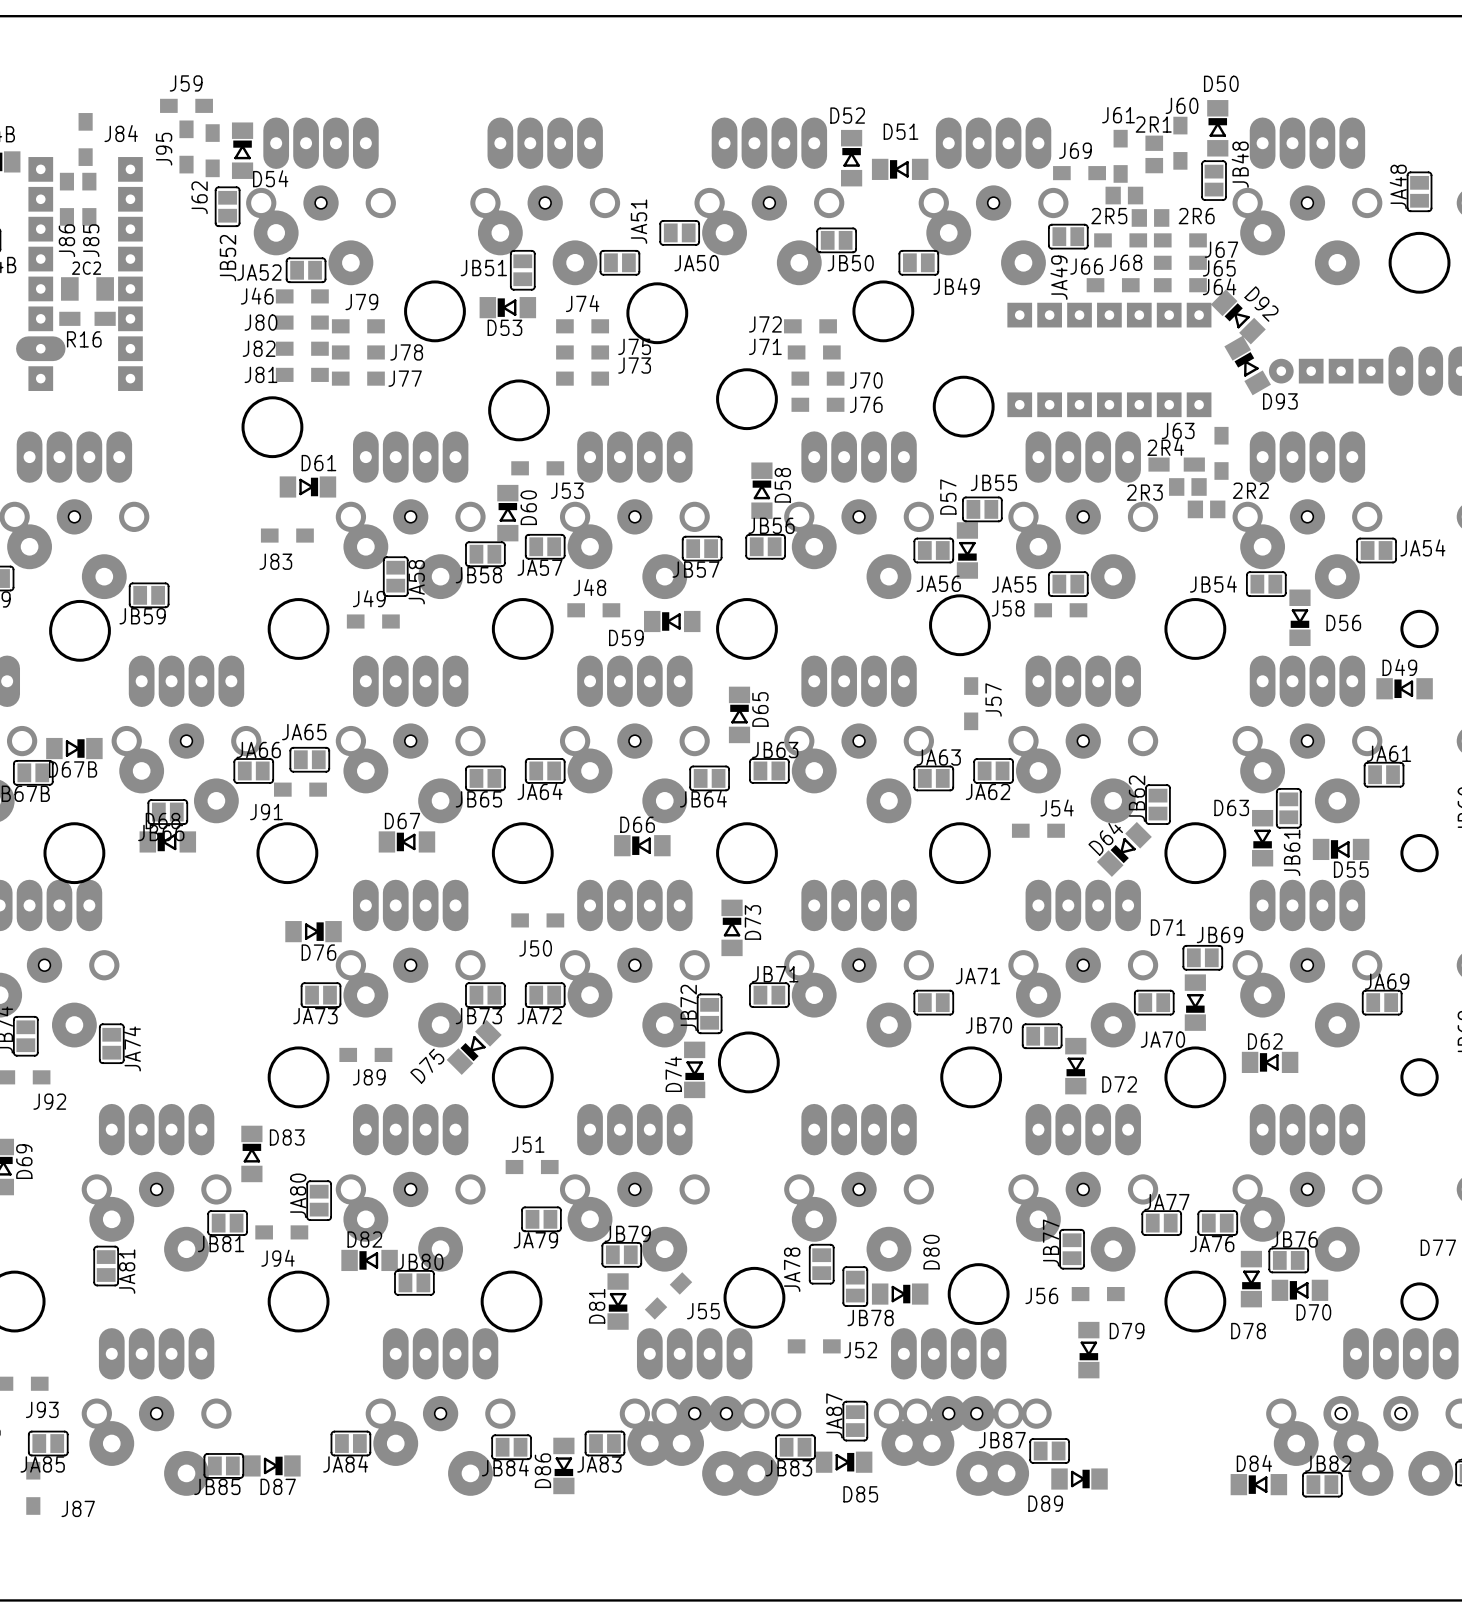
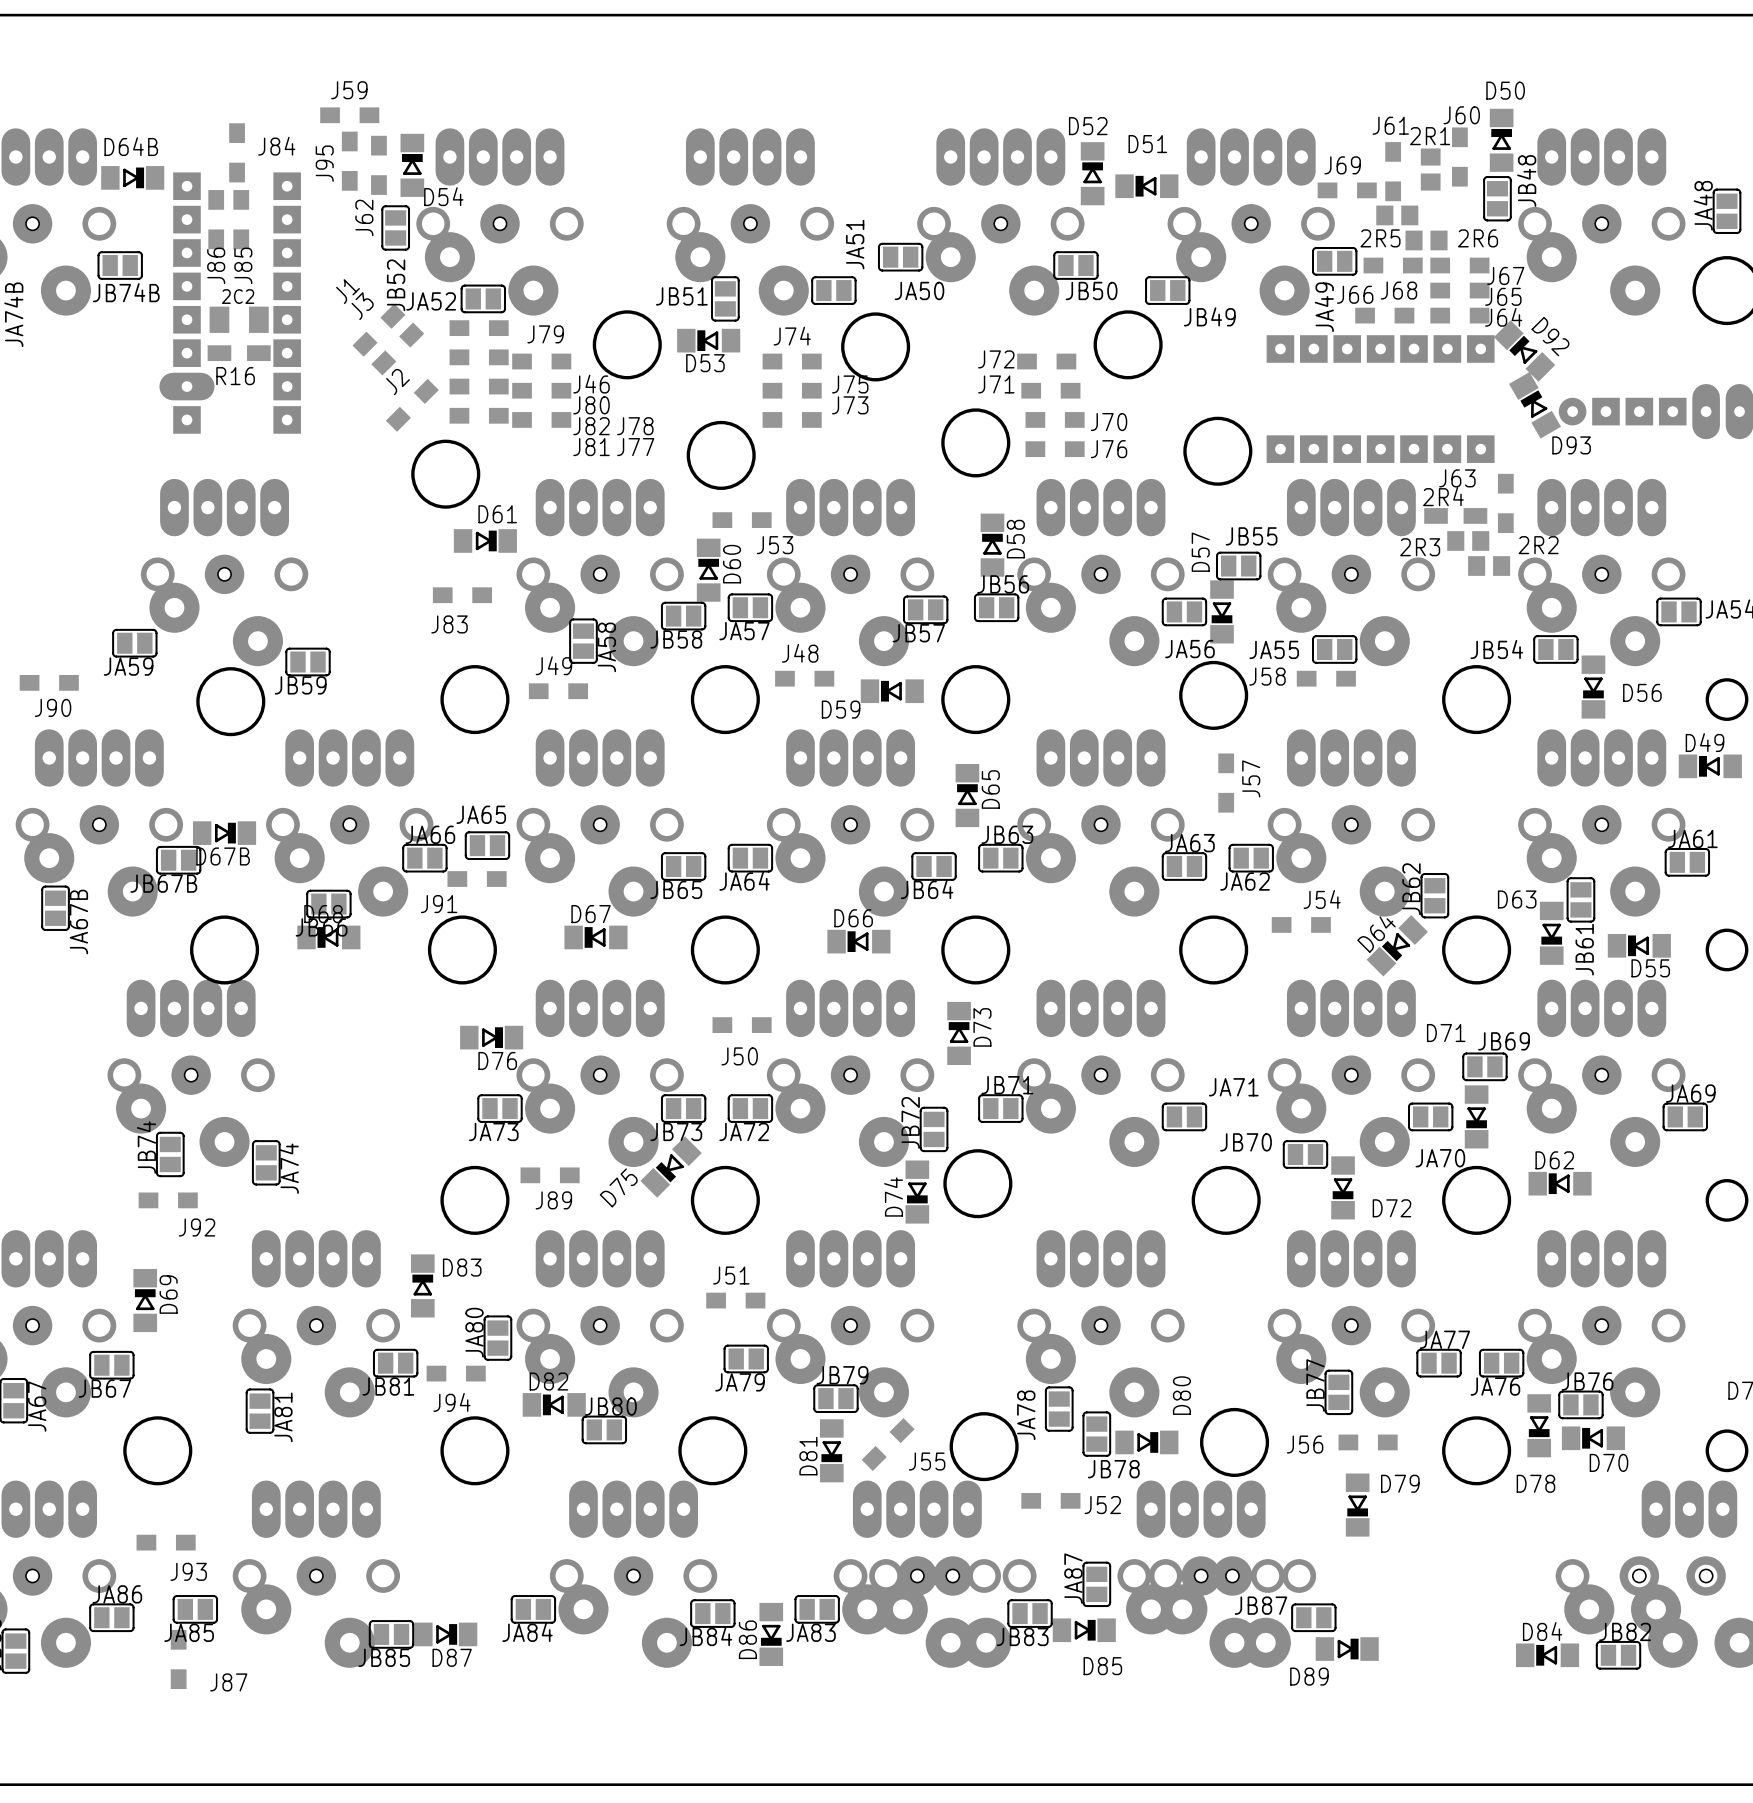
J46 name position: J46 (257, 296) -> J46 (591, 384)
J1: none -> (378, 330)
J3: none -> (397, 348)
J80 name position: J80 (260, 322) -> J80 (591, 405)
J82 name position: J82 (259, 348) -> J82 (591, 426)
J78 name position: J78 (406, 352) -> J78 (635, 426)
J2: none -> (412, 405)
J81 name position: J81 (260, 374) -> J81 (591, 447)
J77 name position: J77 (405, 378) -> J77 (635, 447)

